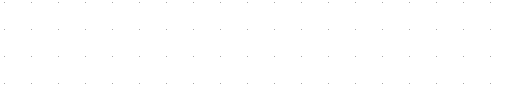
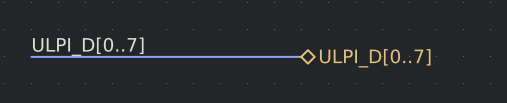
label: none -> ULPI_D[0..7] (88, 46)
bus: none -> (31, 56) (301, 56)
hierarchical label: none -> ULPI_D[0..7] (375, 58)

